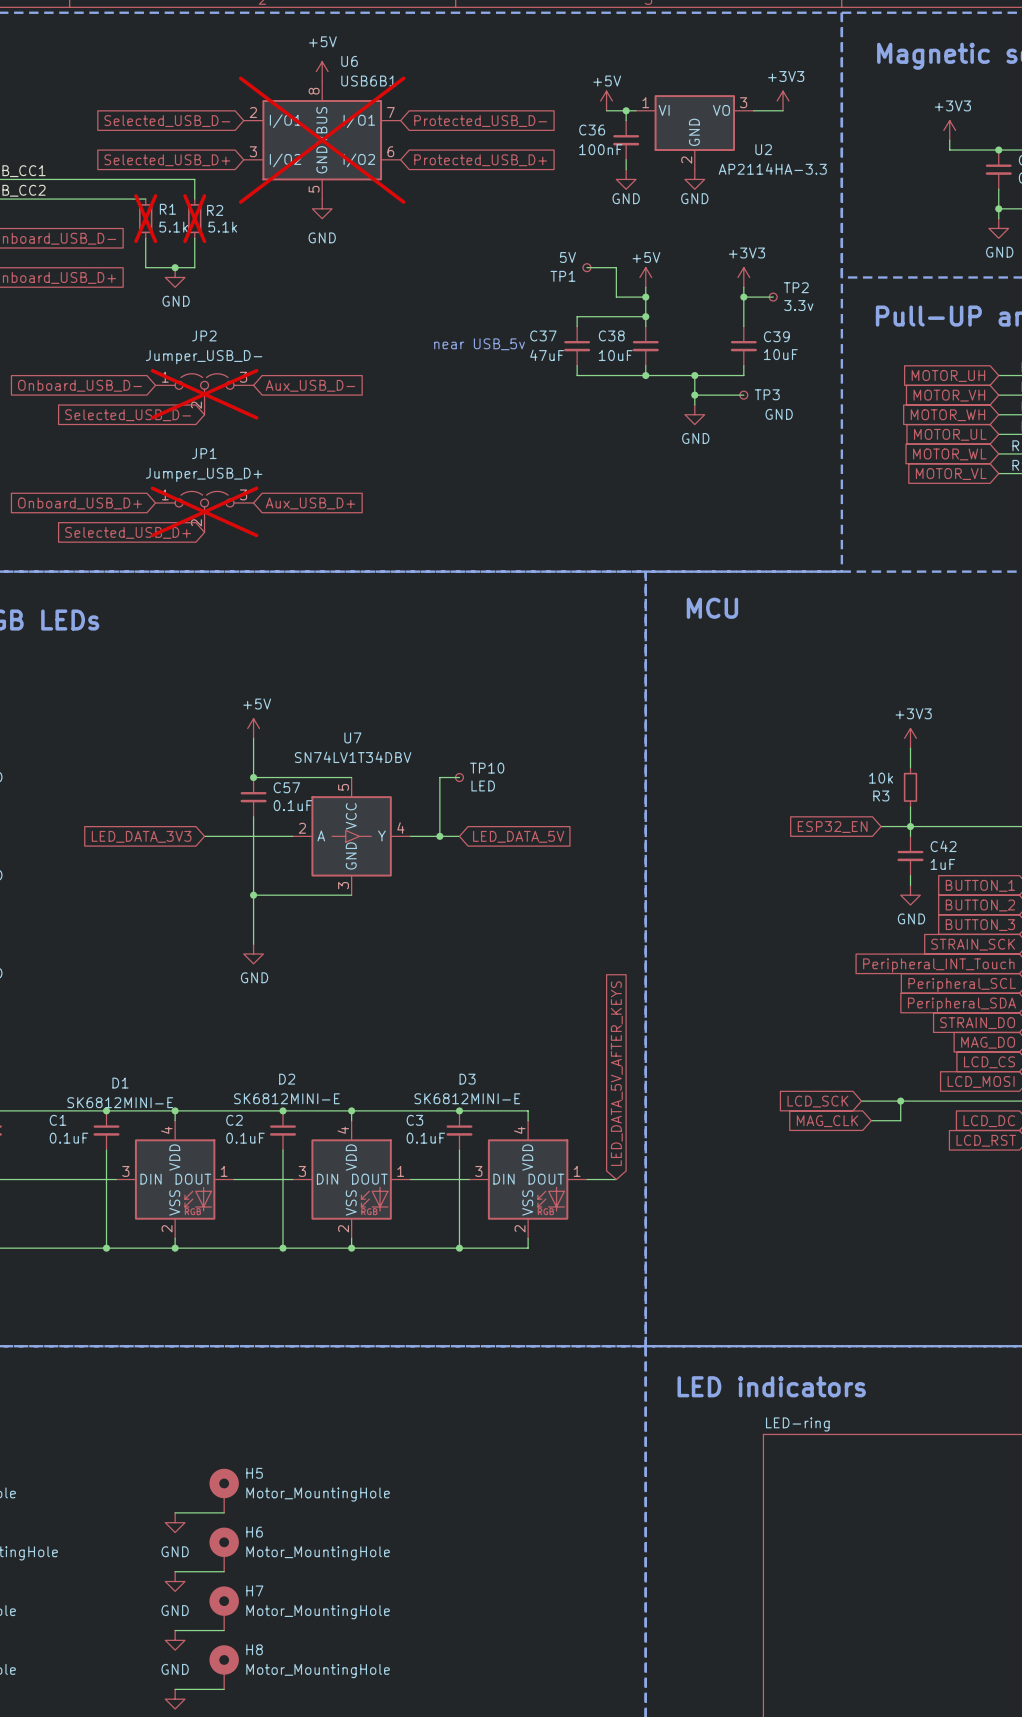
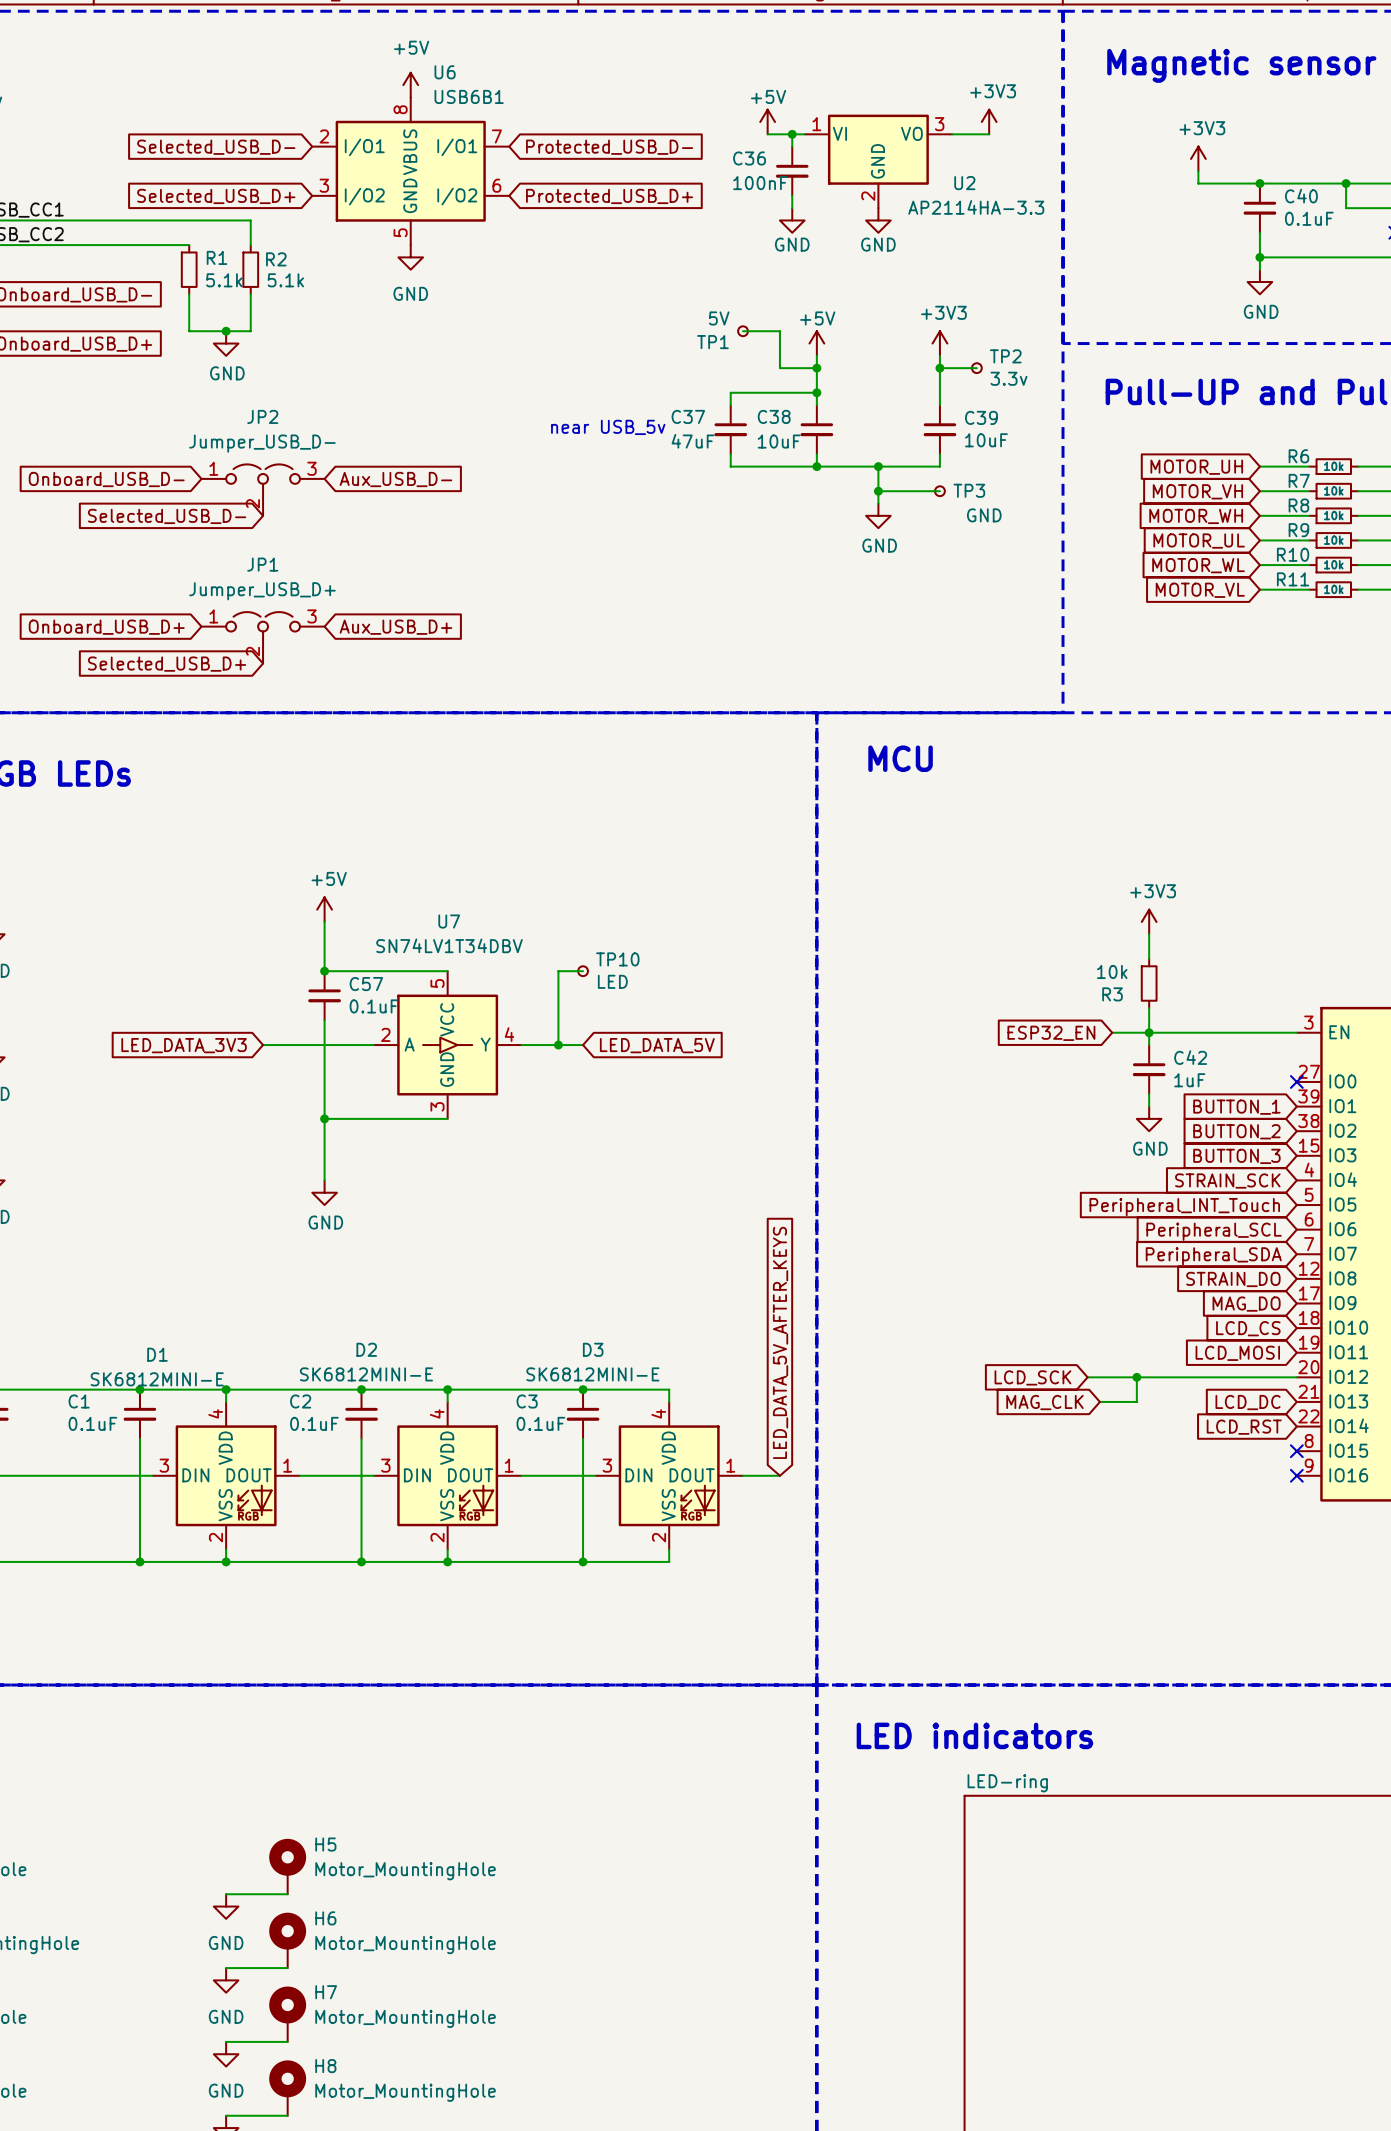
U6 do-not-place cross: (322, 140) -> none
R1 do-not-place cross: (145, 218) -> none
R2 do-not-place cross: (194, 218) -> none
JP2 do-not-place cross: (204, 394) -> none
JP1 do-not-place cross: (204, 511) -> none

